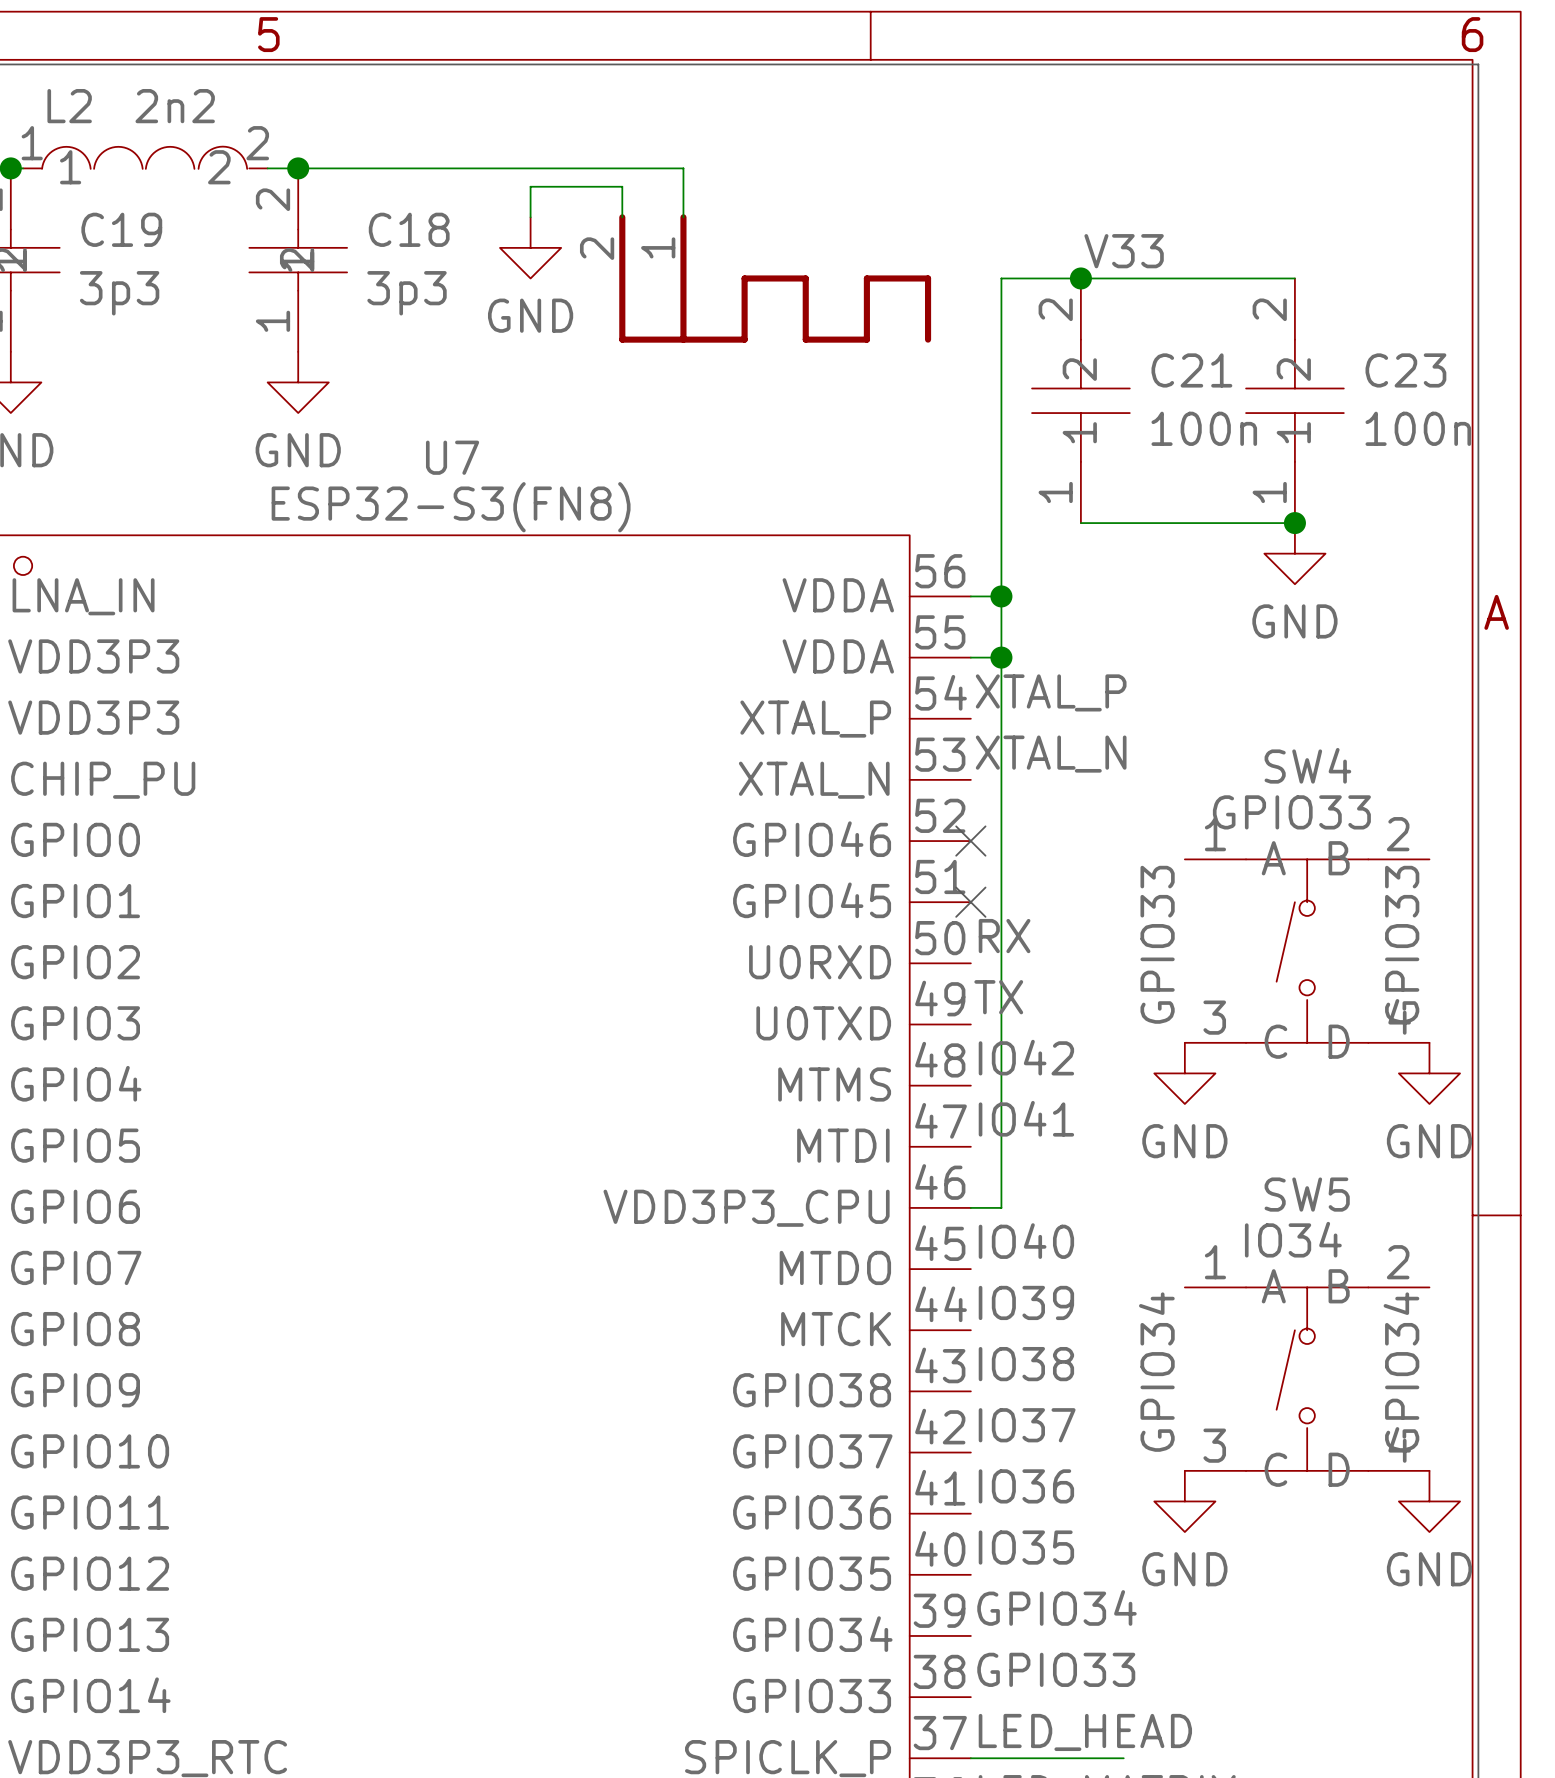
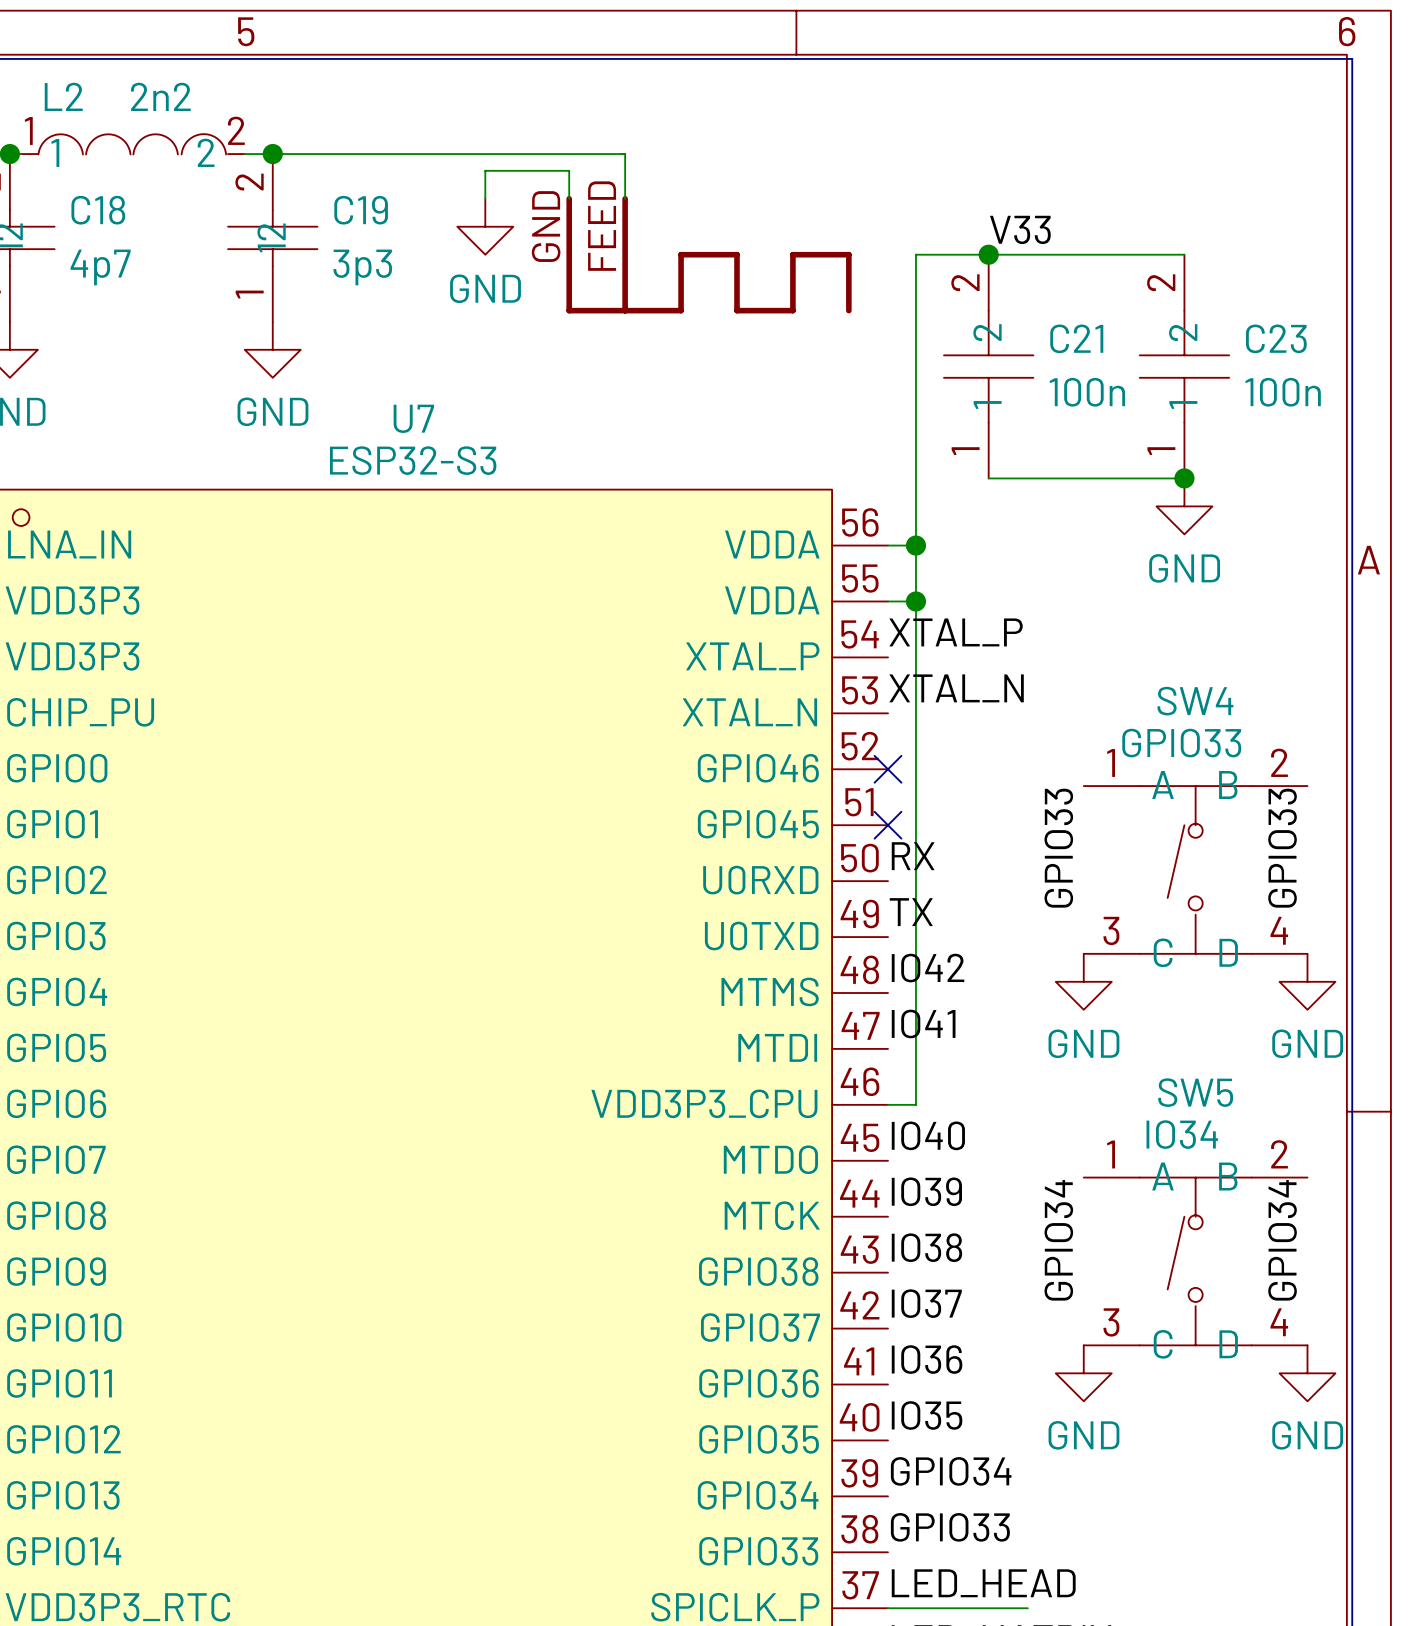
C19 name: C19 (121, 229) -> C18 (98, 210)
C18 name: C18 (409, 229) -> C19 (361, 210)
part pin number: 1 (658, 247) -> FEED (602, 226)
part pin number: 2 (597, 248) -> GND (546, 226)
C19 value: 3p3 (119, 293) -> 4p7 (100, 267)
U7 value: ESP32-S3(FN8) (451, 507) -> ESP32-S3 (413, 460)

